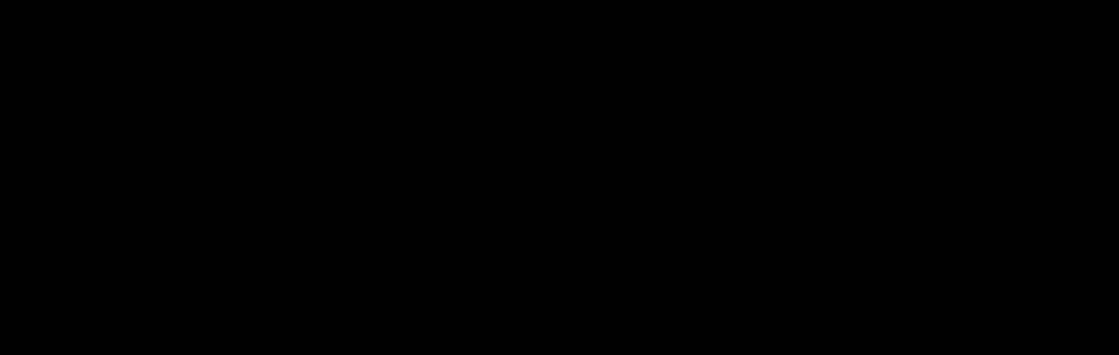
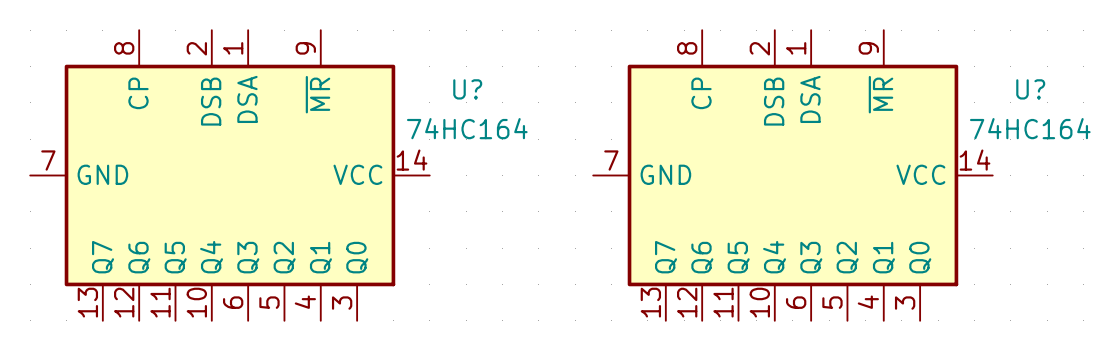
U?: none -> 74HC164 (229, 175)
U?: none -> 74HC164 (792, 175)

